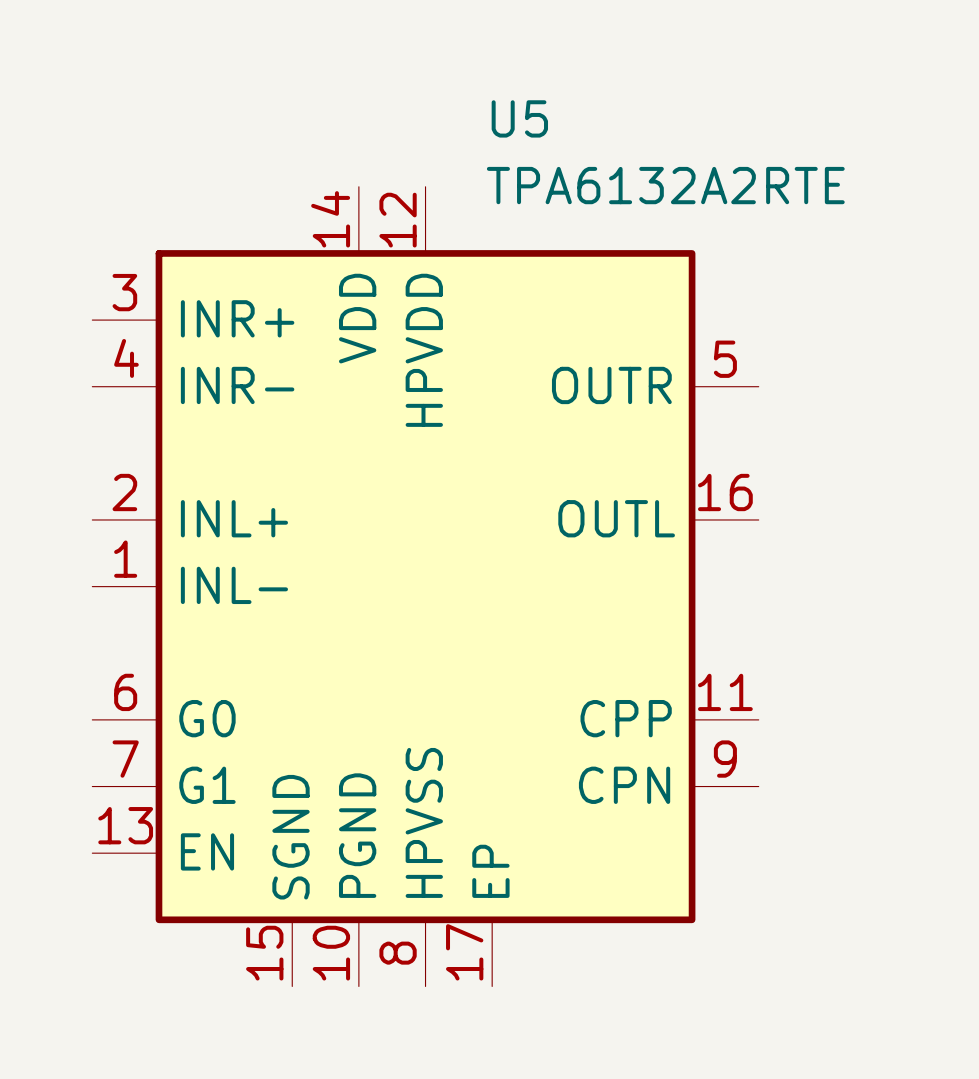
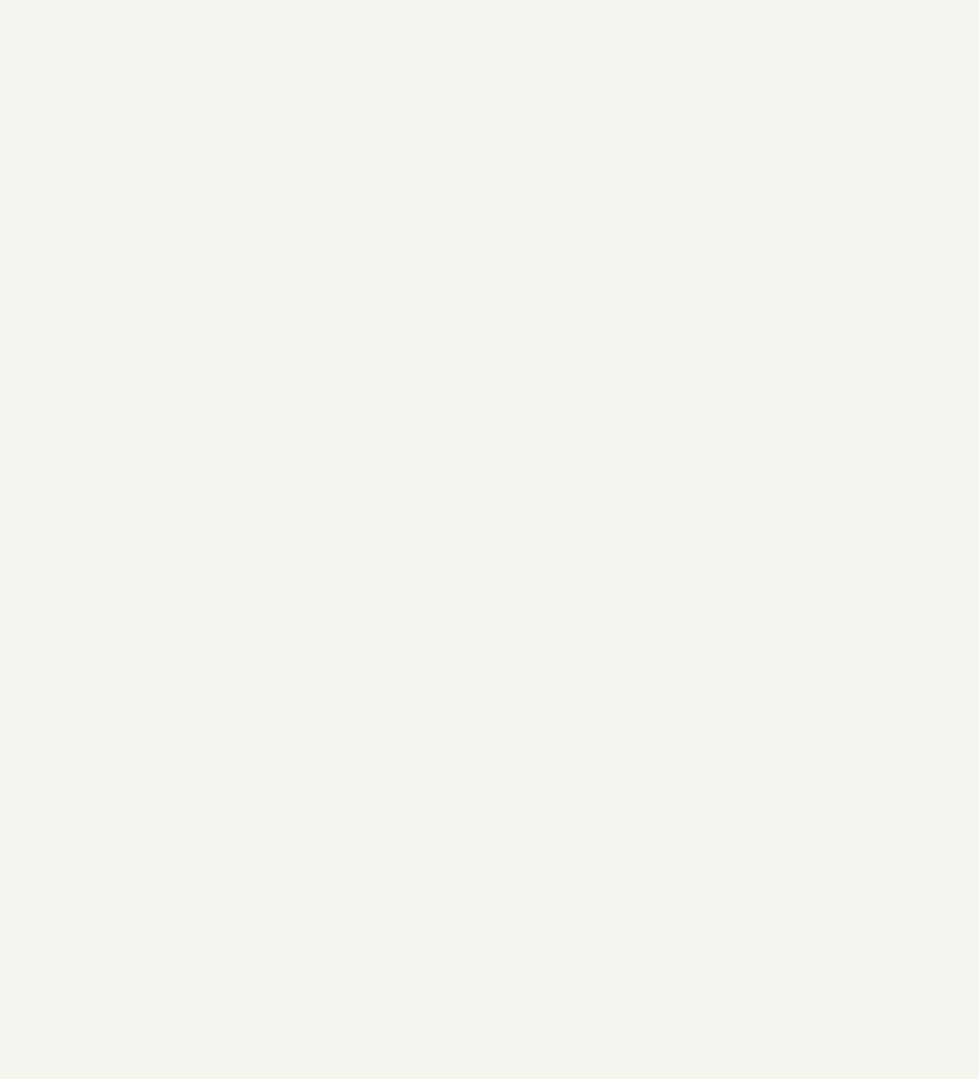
U5: TPA6132A2RTE (425, 586) -> none

